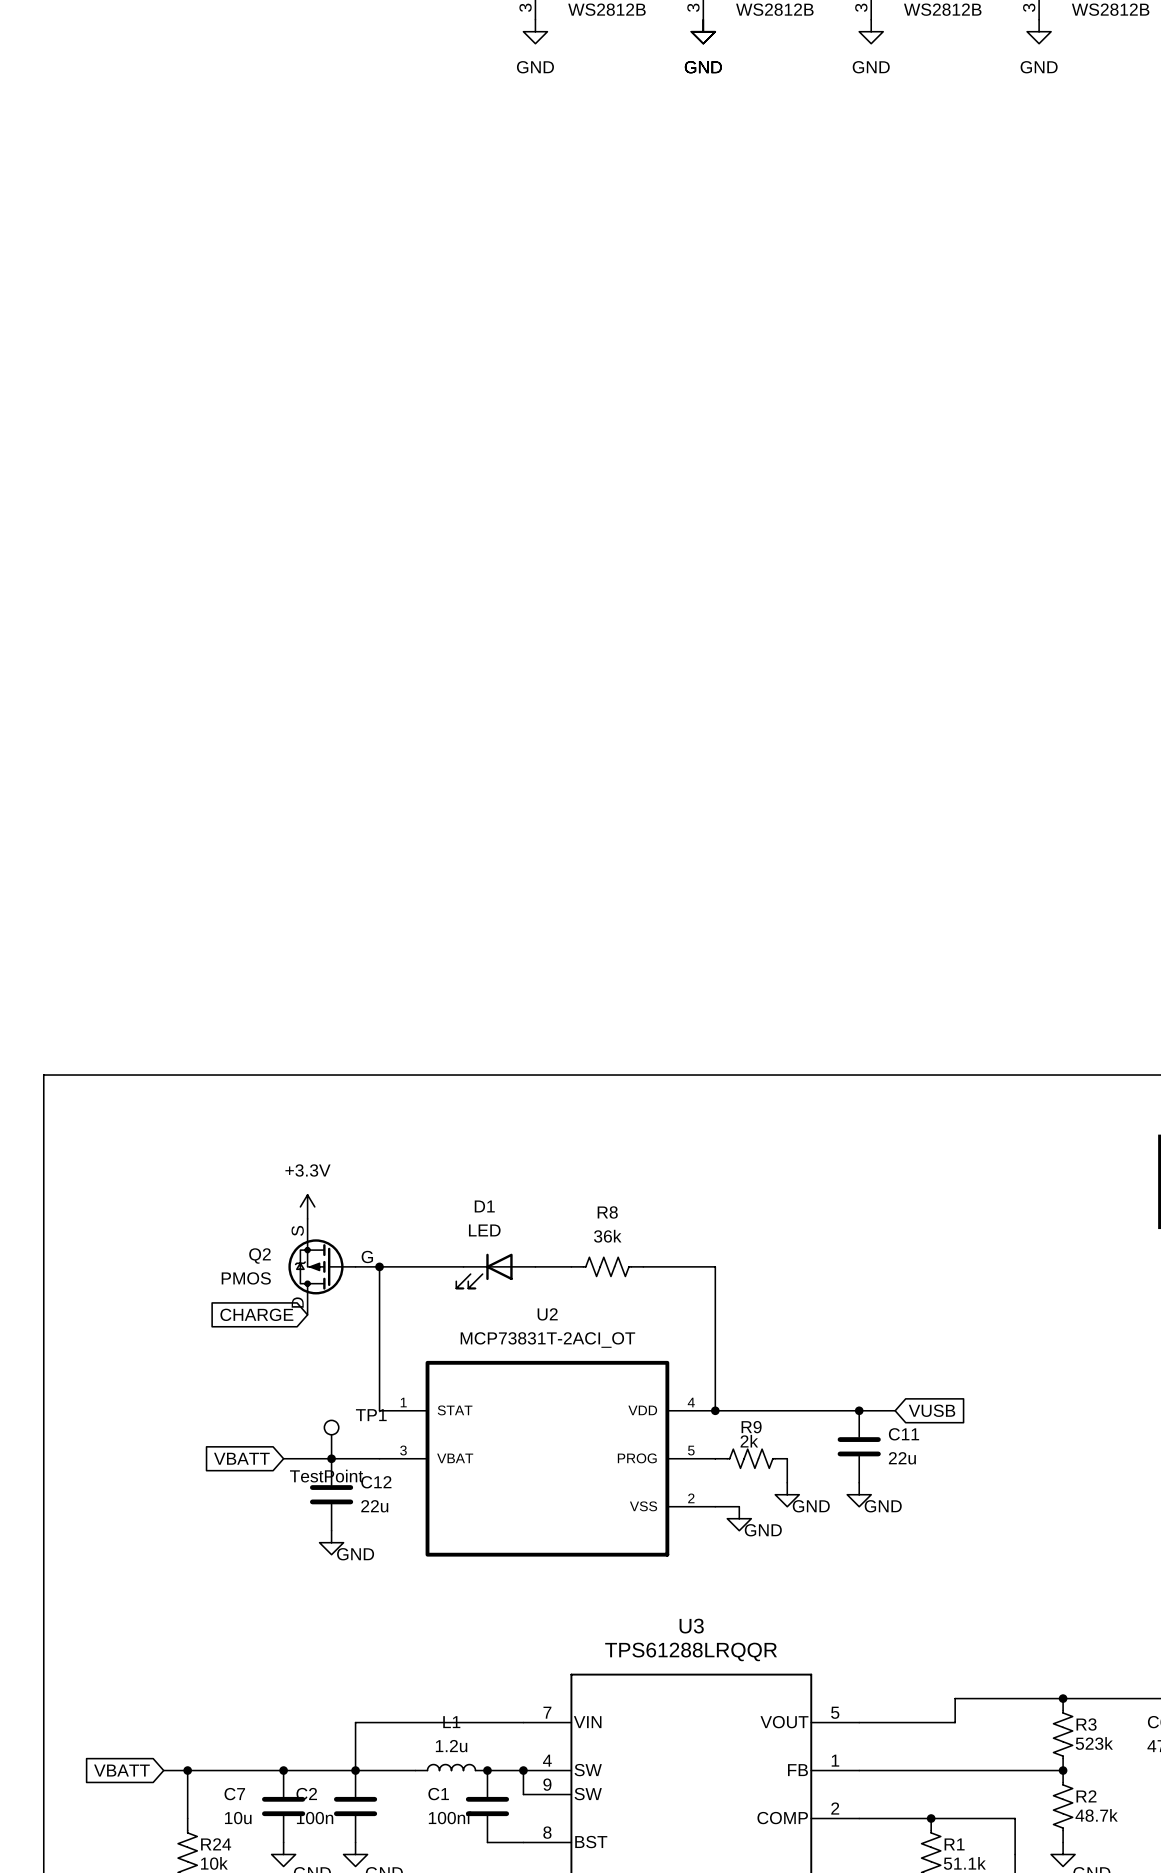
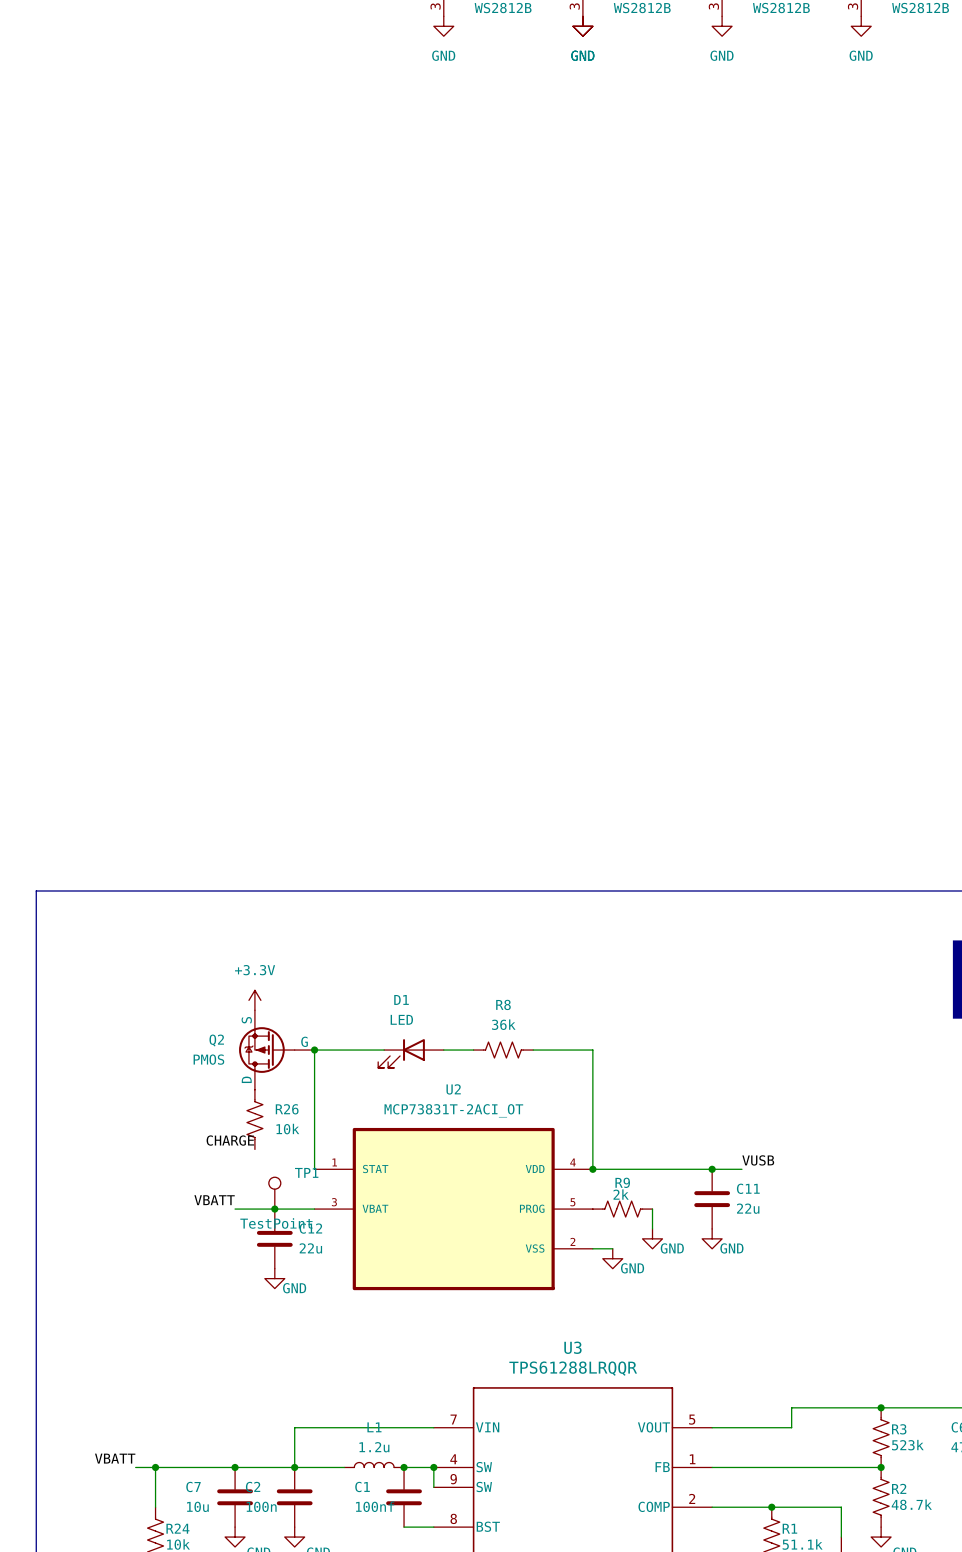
global label: CHARGE (256, 1314) -> none
R26: none -> 10k (254, 1119)
label: none -> CHARGE (230, 1140)
label: none -> VUSB (758, 1160)
global label: VUSB (932, 1410) -> none
label: none -> VBATT (214, 1200)
global label: VBATT (241, 1458) -> none
label: none -> VBATT (115, 1458)
global label: VBATT (121, 1770) -> none

